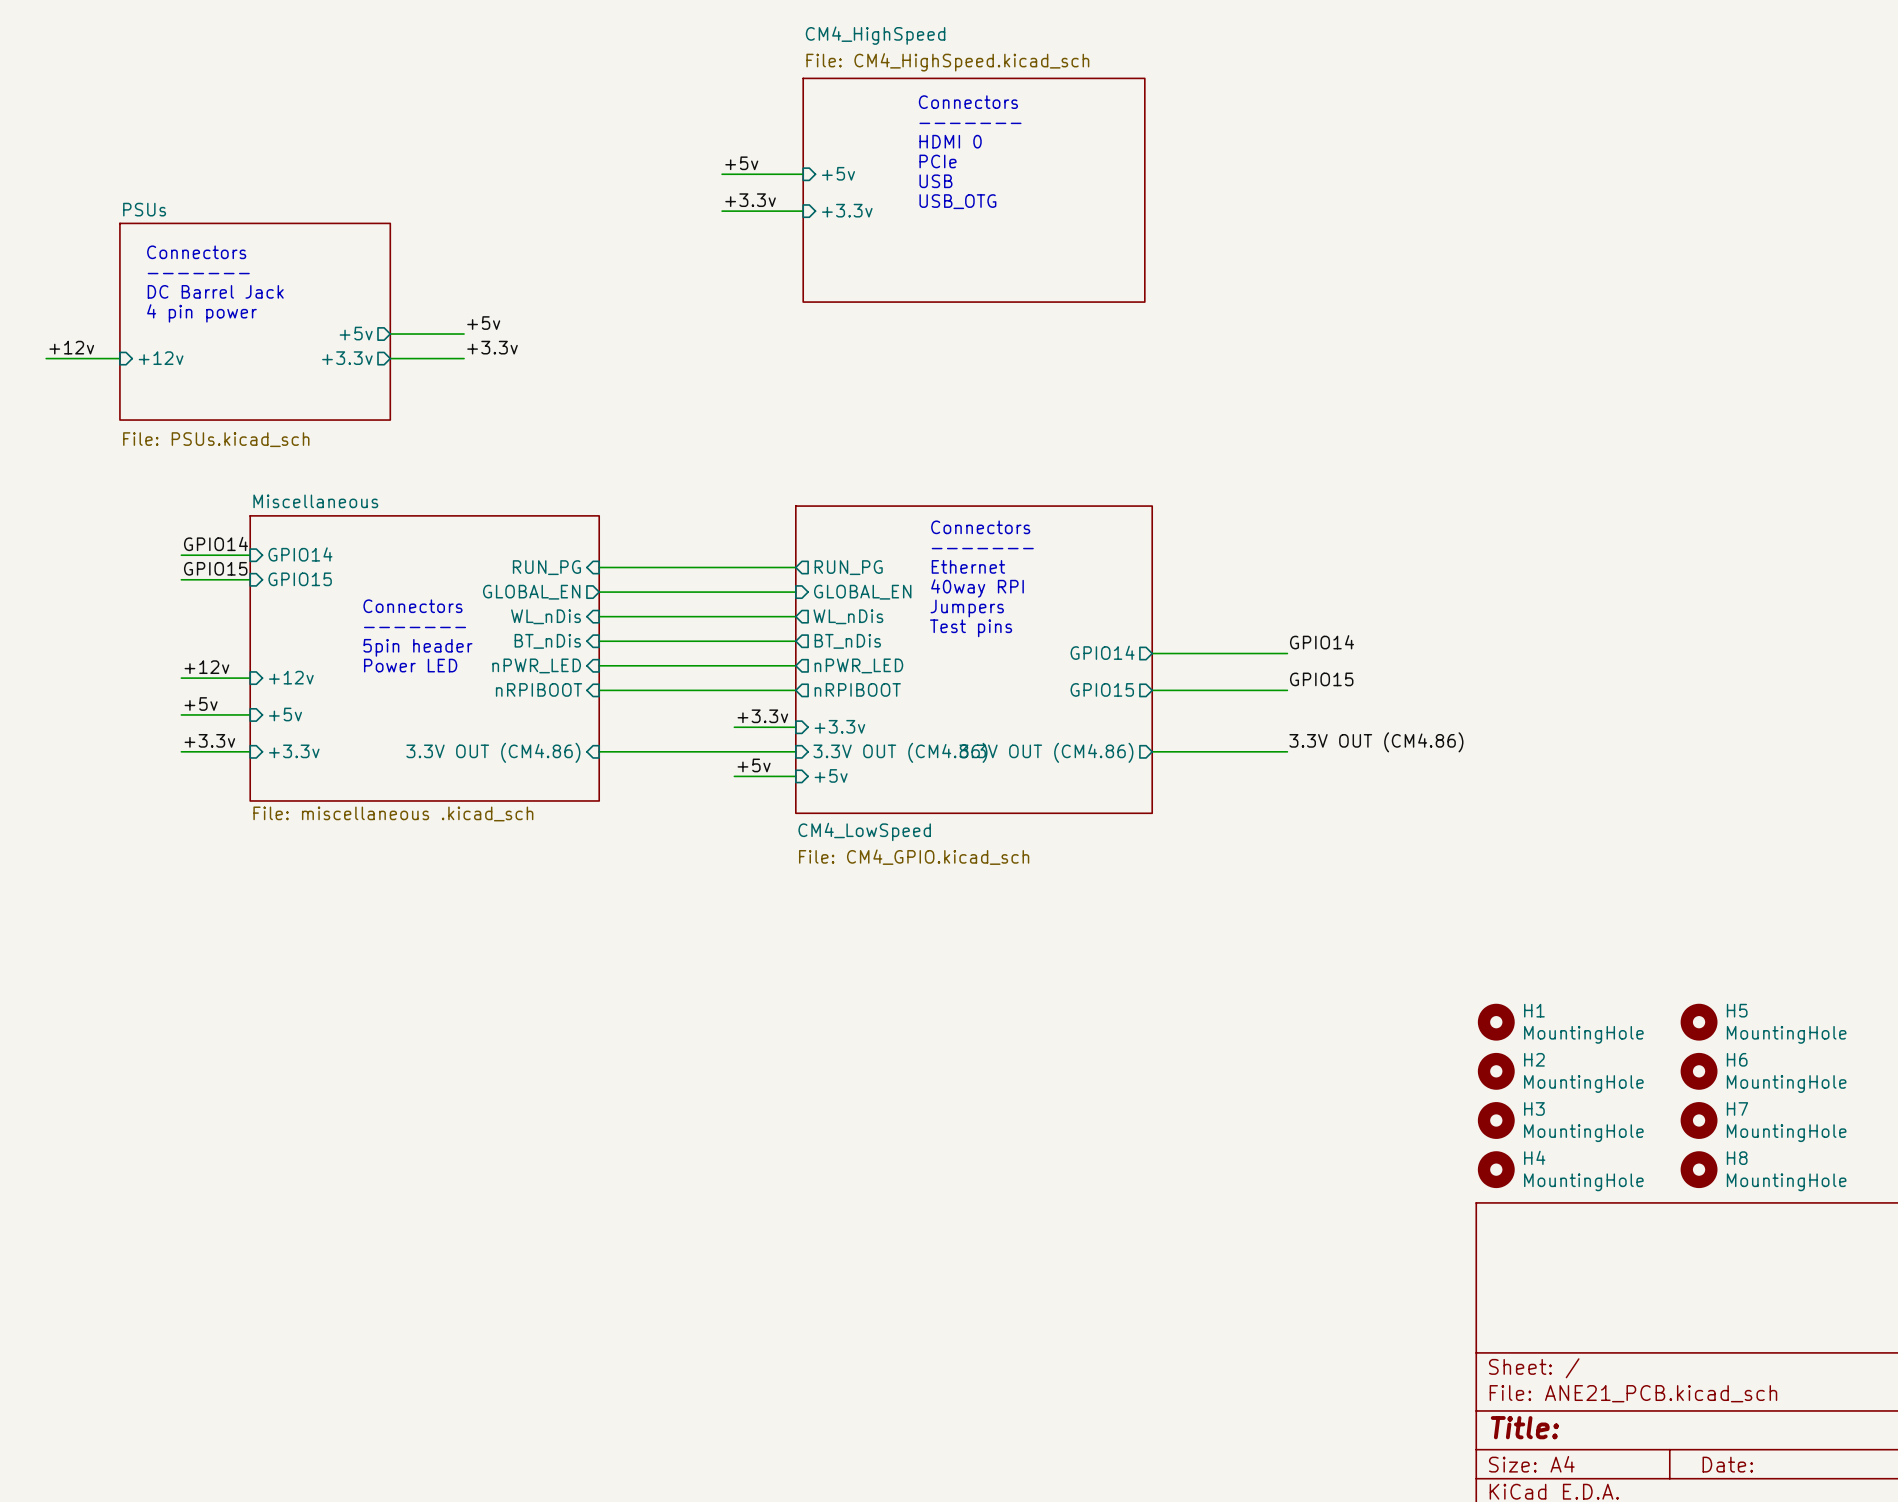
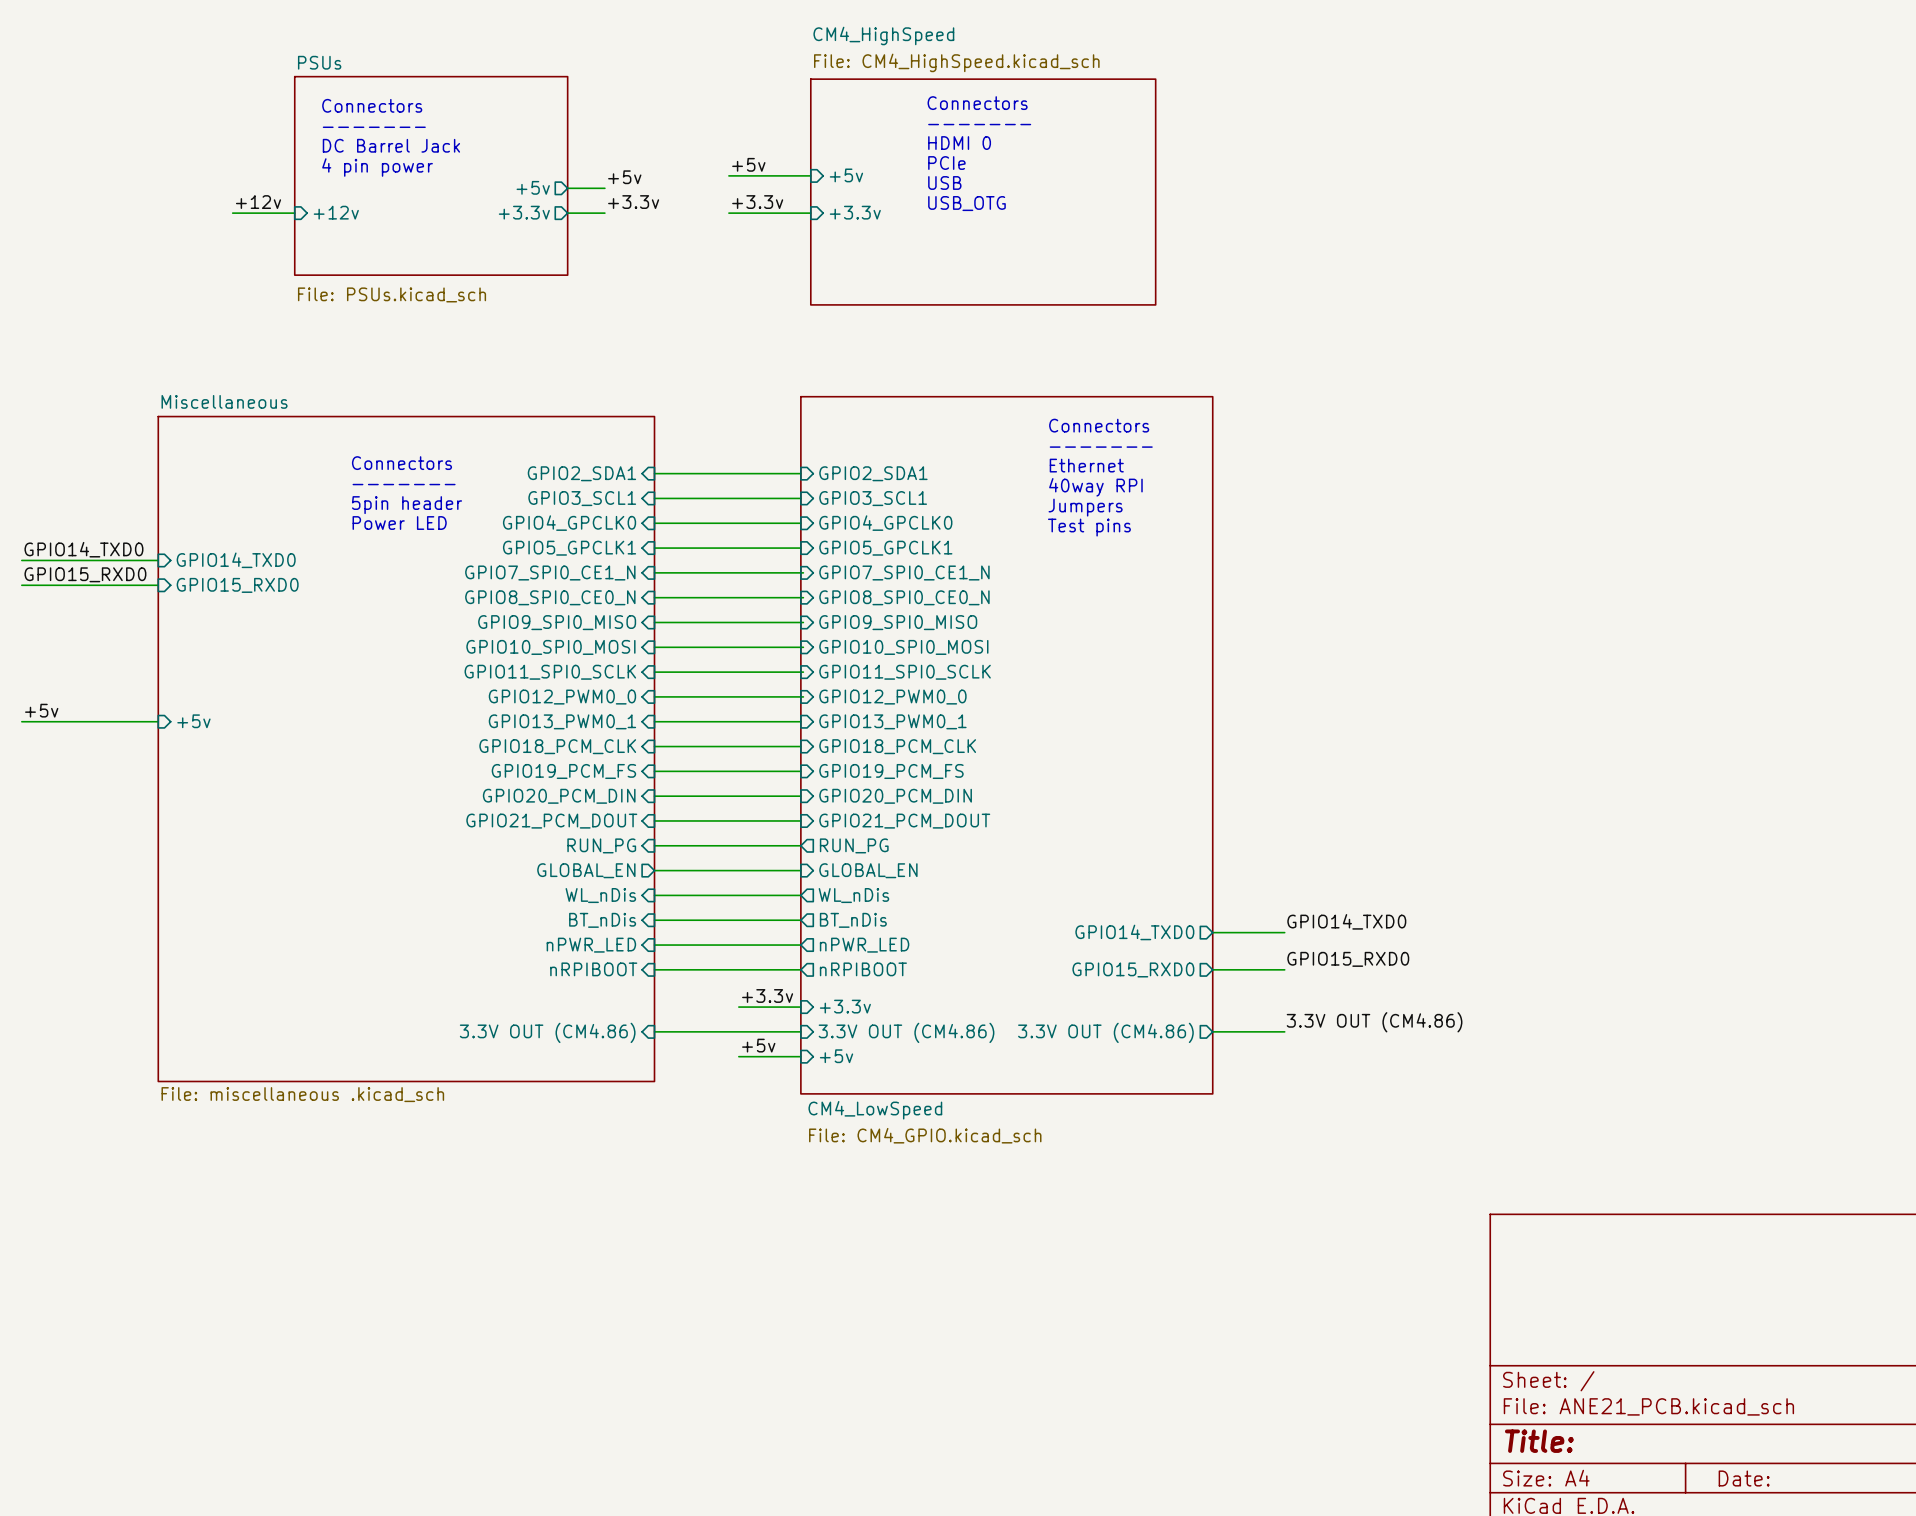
text: none -> Connectors (372, 105)
text: none -> ------- (374, 127)
sheet pin: none -> +5v (533, 187)
wire: none -> (567, 188) (604, 188)
label: none -> +12v (258, 202)
wire: none -> (232, 213) (294, 213)
wire: none -> (567, 213) (604, 213)
text: Connectors (196, 252) -> none
text: ------- (198, 273) -> none
text position: DC Barrel Jack (215, 291) -> DC Barrel Jack (391, 145)
text position: 4 pin power (201, 313) -> 4 pin power (377, 167)
sheet PSUs position: (255, 321) -> (431, 175)
label position: +5v (483, 323) -> +5v (624, 177)
sheet pin: +5v (356, 333) -> none
wire: (390, 334) (464, 334) -> none
label: +12v (71, 347) -> none
label position: +3.3v (492, 347) -> +3.3v (633, 202)
wire: (46, 358) (119, 358) -> none
sheet pin position: +12v (161, 358) -> +12v (336, 212)
sheet pin position: +3.3v (347, 358) -> +3.3v (524, 212)
wire: (390, 358) (464, 358) -> none
text: none -> Connectors (402, 463)
sheet pin: none -> GPIO2_SDA1 (581, 473)
wire: none -> (654, 473) (800, 473)
sheet pin: none -> GPIO2_SDA1 (873, 473)
text: none -> ------- (404, 484)
sheet pin: none -> GPIO3_SCL1 (582, 498)
wire: none -> (654, 498) (800, 498)
sheet pin: none -> GPIO3_SCL1 (873, 498)
sheet CM4_LowSpeed shape: [795, 505, 1153, 815] -> [800, 395, 1214, 1095]
sheet pin: none -> GPIO4_GPCLK0 (569, 523)
wire: none -> (654, 523) (800, 523)
sheet pin: none -> GPIO4_GPCLK0 (885, 523)
text position: Connectors (980, 527) -> Connectors (1099, 425)
wire: none -> (654, 548) (800, 548)
label: GPIO14 (216, 543) -> none
sheet pin: none -> GPIO5_GPCLK1 (569, 548)
sheet pin: none -> GPIO5_GPCLK1 (885, 548)
label: none -> GPIO14_TXD0 (83, 549)
text position: ------- (982, 548) -> ------- (1101, 447)
sheet pin: GPIO14 (300, 554) -> GPIO14_TXD0 (236, 560)
wire: none -> (21, 560) (158, 560)
wire: (181, 555) (250, 555) -> none
text position: Ethernet (968, 566) -> Ethernet (1086, 465)
sheet pin: none -> GPIO7_SPI0_CE1_N (550, 573)
sheet pin: RUN_PG (546, 567) -> none
wire: (599, 567) (648, 567) -> none
sheet pin shape: output (848, 567) -> input (904, 573)
sheet pin: RUN_PG (848, 567) -> GPIO7_SPI0_CE1_N (904, 573)
label: GPIO15 (215, 568) -> none
label: none -> GPIO15_RXD0 (85, 574)
wire: none -> (21, 585) (158, 585)
wire: (181, 579) (250, 579) -> none
sheet pin: GPIO15 (300, 579) -> GPIO15_RXD0 (237, 585)
text position: 40way RPI (977, 588) -> 40way RPI (1095, 487)
sheet pin: GLOBAL_EN (531, 592) -> none
sheet pin: none -> GPIO8_SPI0_CE0_N (550, 597)
wire: (599, 592) (648, 592) -> none
sheet pin: GLOBAL_EN (862, 592) -> GPIO8_SPI0_CE0_N (904, 597)
text: Connectors (412, 606) -> none
text position: Jumpers (967, 608) -> Jumpers (1085, 507)
sheet pin: WL_nDis (546, 616) -> none
sheet pin: none -> GPIO9_SPI0_MISO (557, 622)
wire: (599, 616) (648, 616) -> none
sheet pin shape: output (848, 616) -> input (898, 622)
sheet pin: WL_nDis (848, 616) -> GPIO9_SPI0_MISO (898, 622)
text: ------- (415, 627) -> none
text position: Test pins (971, 628) -> Test pins (1089, 527)
sheet pin: none -> GPIO10_SPI0_MOSI (550, 647)
sheet pin: BT_nDis (547, 641) -> none
wire: (599, 641) (648, 641) -> none
sheet pin shape: output (847, 641) -> input (903, 647)
sheet pin: BT_nDis (847, 641) -> GPIO10_SPI0_MOSI (903, 647)
label: GPIO14 (1322, 642) -> none
text position: 5pin header (417, 647) -> 5pin header (407, 505)
sheet pin: GPIO14 (1102, 652) -> none
wire: (1152, 653) (1287, 653) -> none
sheet Miscellaneous: File: miscellaneous .kicad_sch (424, 658) -> none
text position: Power LED (410, 665) -> Power LED (399, 523)
sheet pin: nPWR_LED (536, 665) -> none
sheet pin: none -> GPIO11_SPI0_SCLK (550, 672)
wire: (599, 665) (648, 665) -> none
sheet pin shape: output (858, 665) -> input (905, 672)
sheet pin: nPWR_LED (858, 665) -> GPIO11_SPI0_SCLK (905, 672)
label: +12v (206, 667) -> none
sheet pin: +12v (291, 677) -> none
wire: (181, 678) (250, 678) -> none
label: GPIO15 (1321, 679) -> none
sheet pin: nRPIBOOT (539, 689) -> none
sheet pin shape: output (857, 689) -> input (892, 697)
sheet pin: nRPIBOOT (857, 689) -> GPIO12_PWM0_0 (892, 697)
sheet pin: GPIO15 (1102, 689) -> none
sheet pin: none -> GPIO12_PWM0_0 (562, 697)
wire: (599, 690) (648, 690) -> none
wire: (1152, 690) (1287, 690) -> none
label position: +5v (201, 704) -> +5v (41, 710)
wire: none -> (21, 721) (158, 721)
wire: (181, 714) (250, 714) -> none
sheet pin position: +5v (285, 714) -> +5v (193, 721)
wire: none -> (654, 721) (800, 721)
sheet pin: none -> GPIO13_PWM0_1 (562, 721)
sheet pin: none -> GPIO13_PWM0_1 (892, 721)
label: +3.3v (762, 716) -> none
sheet pin: +3.3v (839, 726) -> none
wire: (734, 727) (795, 727) -> none
sheet pin: none -> GPIO18_PCM_CLK (557, 746)
wire: none -> (654, 746) (800, 746)
sheet pin: none -> GPIO18_PCM_CLK (897, 746)
label: +3.3v (209, 740) -> none
sheet Miscellaneous: none -> File: miscellaneous .kicad_sch (406, 749)
label: 3.3V OUT (CM4.86) (1376, 742) -> none
wire: (181, 751) (250, 751) -> none
sheet pin: +3.3v (294, 751) -> none
wire: (599, 751) (795, 751) -> none
wire: (1152, 751) (1287, 751) -> none
sheet pin: 3.3V OUT (CM4.86) (493, 752) -> none
sheet pin: 3.3V OUT (CM4.86) (900, 752) -> none
sheet pin: 3.3V OUT (CM4.86) (1046, 752) -> none
sheet pin: none -> GPIO19_PCM_FS (563, 771)
wire: none -> (654, 771) (800, 771)
sheet pin: none -> GPIO19_PCM_FS (891, 771)
label: +5v (754, 765) -> none
sheet pin: +5v (831, 775) -> none
wire: (734, 776) (795, 776) -> (738, 1007) (800, 1007)
sheet pin: none -> GPIO20_PCM_DIN (559, 796)
wire: none -> (654, 796) (800, 796)
sheet pin: none -> GPIO20_PCM_DIN (895, 796)
sheet pin: none -> GPIO21_PCM_DOUT (551, 821)
wire: none -> (654, 820) (800, 820)
sheet pin: none -> GPIO21_PCM_DOUT (904, 821)
sheet CM4_LowSpeed name position: CM4_LowSpeed (864, 831) -> CM4_LowSpeed (875, 1110)
sheet pin: none -> RUN_PG (601, 845)
wire: none -> (654, 845) (800, 845)
sheet pin: none -> RUN_PG (854, 845)
sheet CM4_LowSpeed value position: File: CM4_GPIO.kicad_sch (914, 857) -> File: CM4_GPIO.kicad_sch (925, 1135)
sheet pin: none -> GLOBAL_EN (586, 870)
wire: none -> (654, 870) (800, 870)
sheet pin: none -> GLOBAL_EN (868, 870)
sheet pin: none -> WL_nDis (600, 895)
wire: none -> (654, 895) (800, 895)
sheet pin: none -> WL_nDis (853, 895)
sheet pin: none -> BT_nDis (602, 920)
wire: none -> (654, 920) (800, 920)
sheet pin: none -> BT_nDis (853, 920)
label: none -> GPIO14_TXD0 (1346, 921)
sheet pin: none -> GPIO14_TXD0 (1134, 932)
wire: none -> (1212, 932) (1284, 932)
sheet pin: none -> nPWR_LED (591, 945)
wire: none -> (654, 945) (800, 945)
sheet pin: none -> nPWR_LED (864, 945)
label: none -> GPIO15_RXD0 (1348, 959)
sheet pin: none -> nRPIBOOT (593, 969)
wire: none -> (654, 969) (800, 969)
sheet pin: none -> nRPIBOOT (863, 969)
sheet pin: none -> GPIO15_RXD0 (1133, 969)
wire: none -> (1212, 969) (1284, 969)
label: none -> +3.3v (767, 995)
sheet pin: none -> +3.3v (845, 1006)
label: none -> 3.3V OUT (CM4.86) (1374, 1022)
wire: none -> (654, 1031) (800, 1031)
wire: none -> (1212, 1031) (1284, 1031)
H1: MountingHole (1496, 1022) -> none
H5: MountingHole (1699, 1022) -> none
sheet pin: none -> 3.3V OUT (CM4.86) (547, 1032)
sheet pin: none -> 3.3V OUT (CM4.86) (906, 1032)
sheet pin: none -> 3.3V OUT (CM4.86) (1105, 1032)
label: none -> +5v (758, 1045)
wire: none -> (738, 1056) (800, 1056)
sheet pin: none -> +5v (836, 1056)
H2: MountingHole (1496, 1071) -> none
H6: MountingHole (1699, 1071) -> none
H3: MountingHole (1496, 1120) -> none
H7: MountingHole (1699, 1120) -> none
H4: MountingHole (1496, 1169) -> none
H8: MountingHole (1699, 1169) -> none

